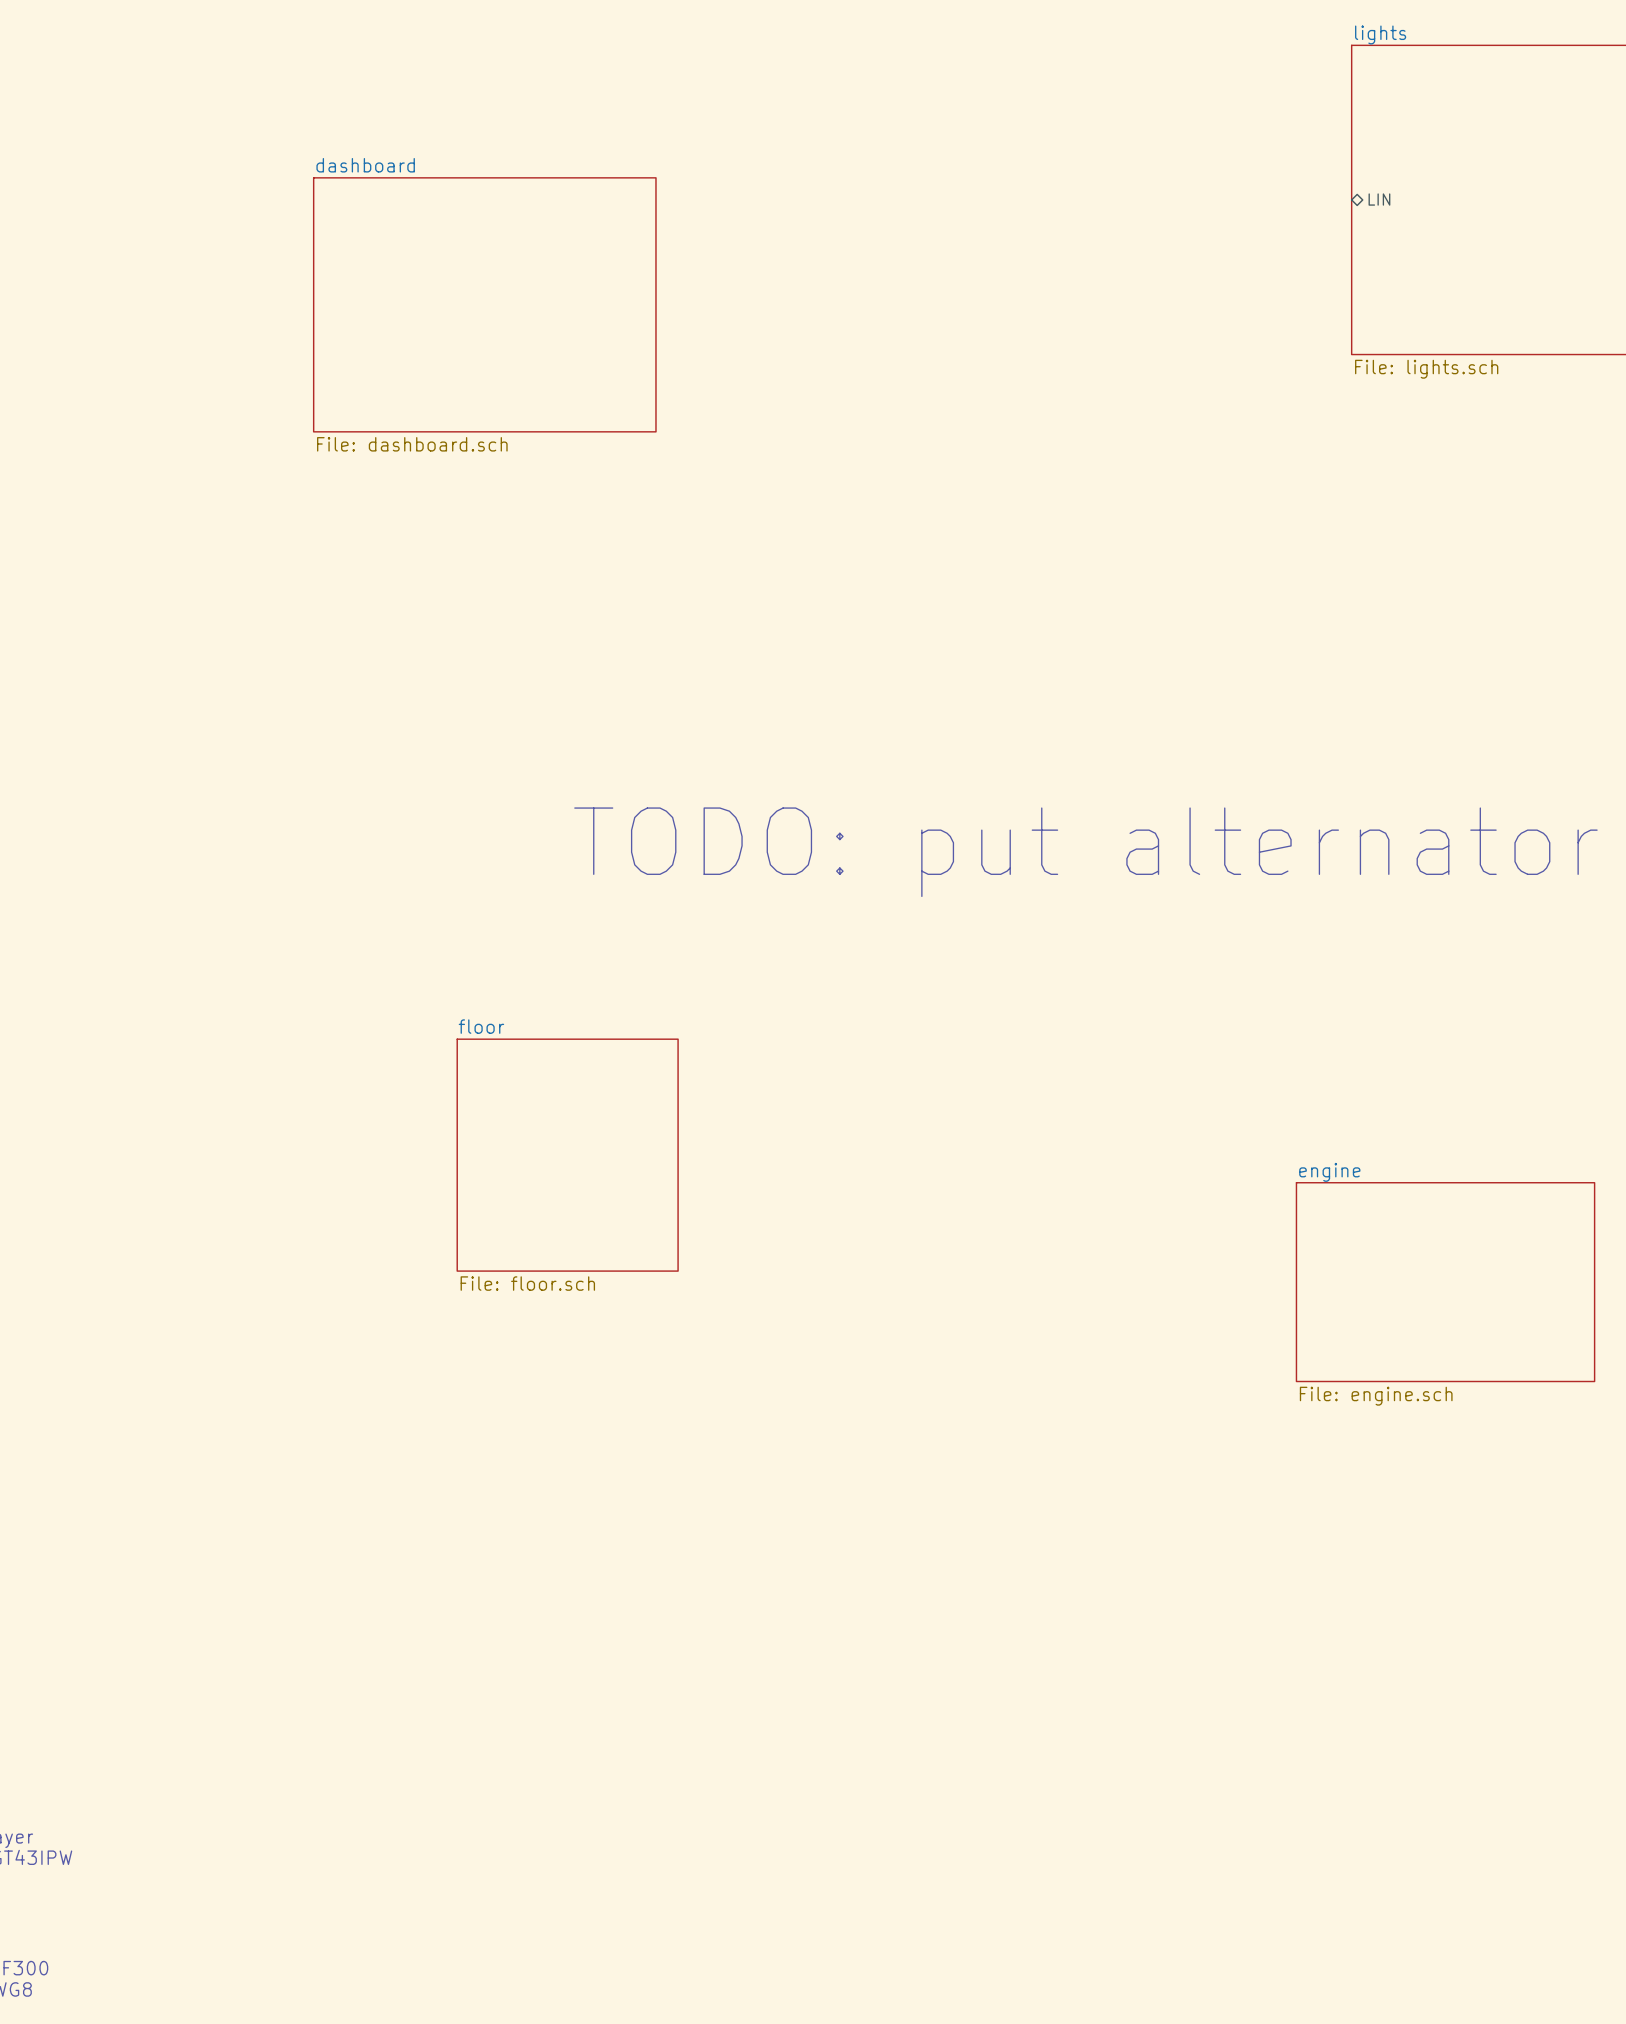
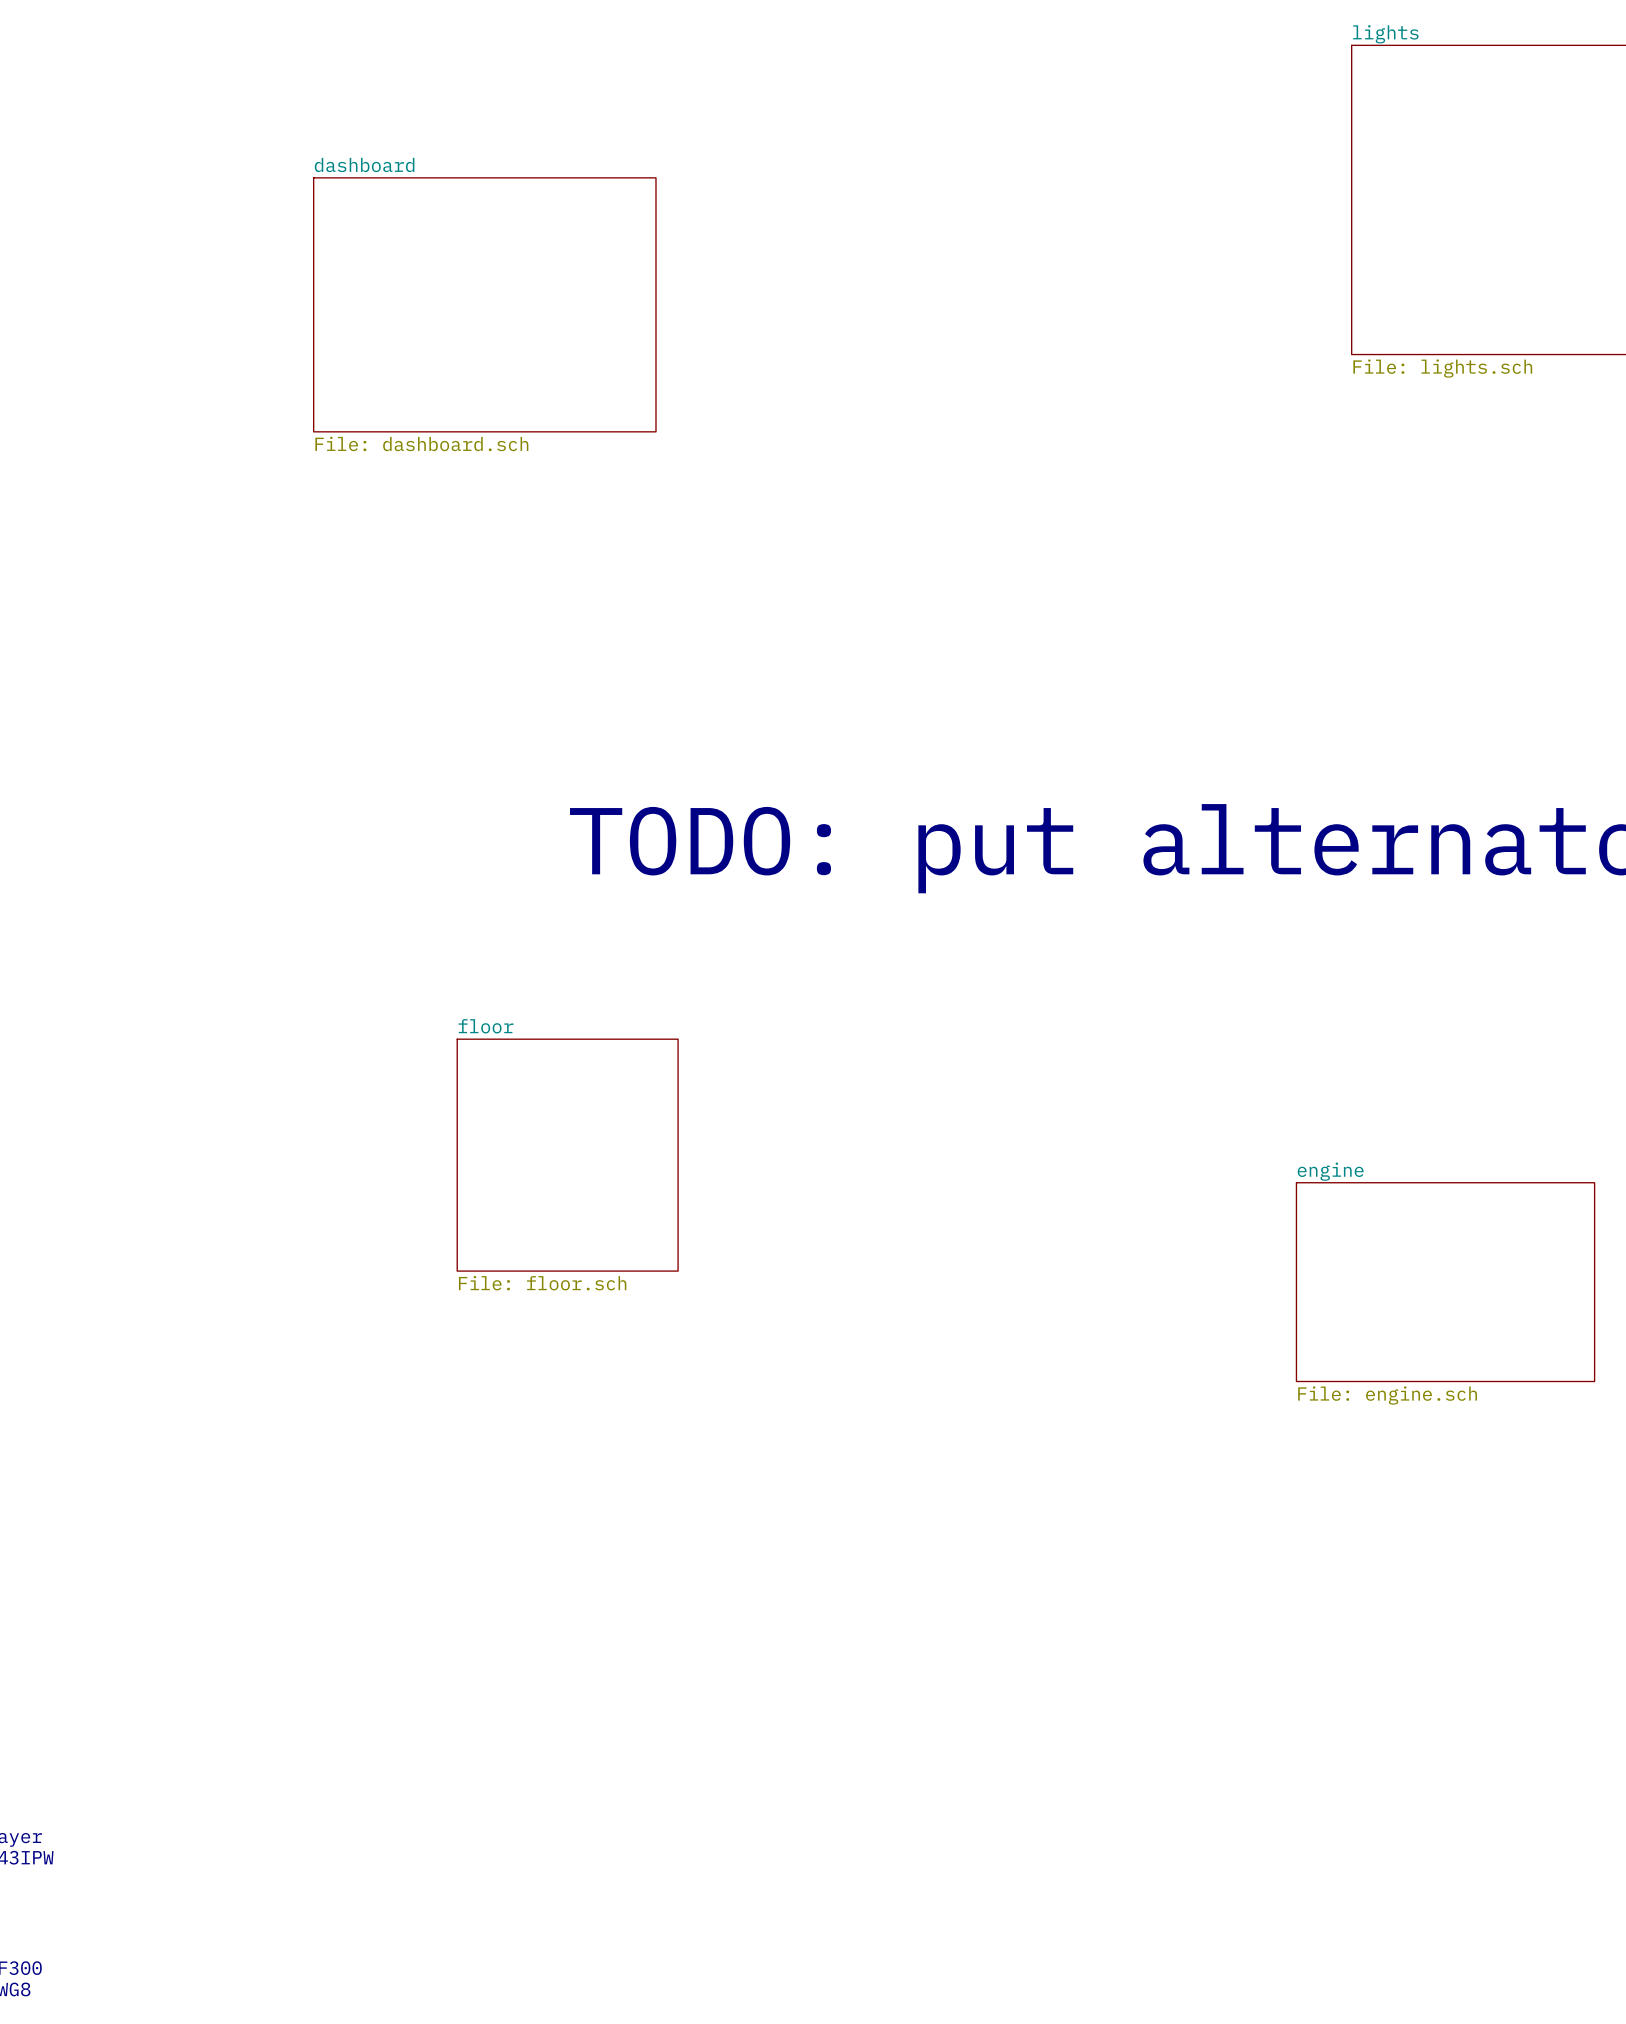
sheet pin: LIN (1379, 199) -> none

